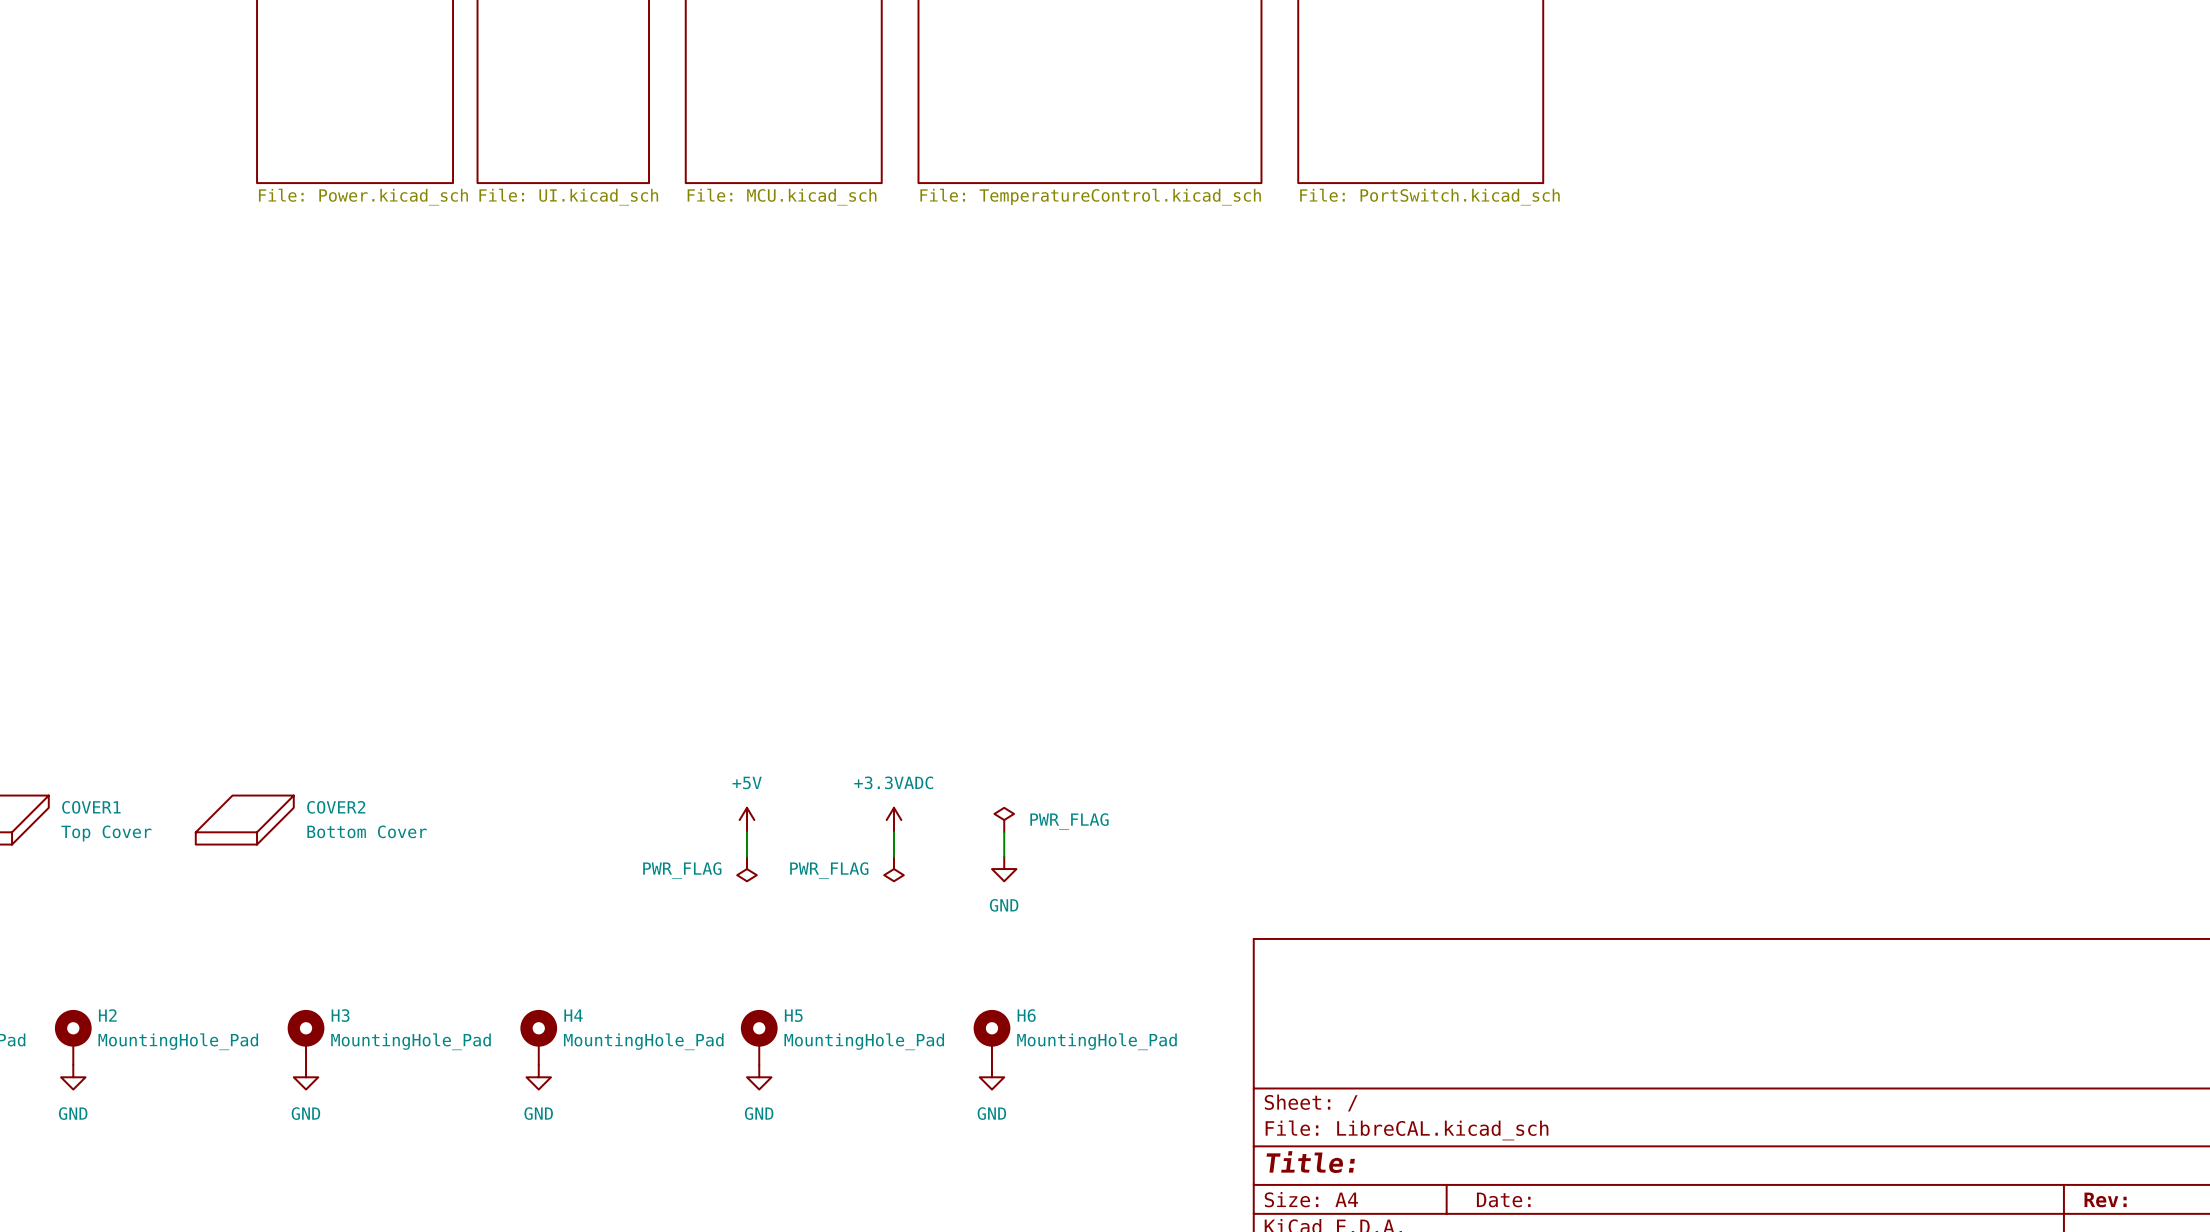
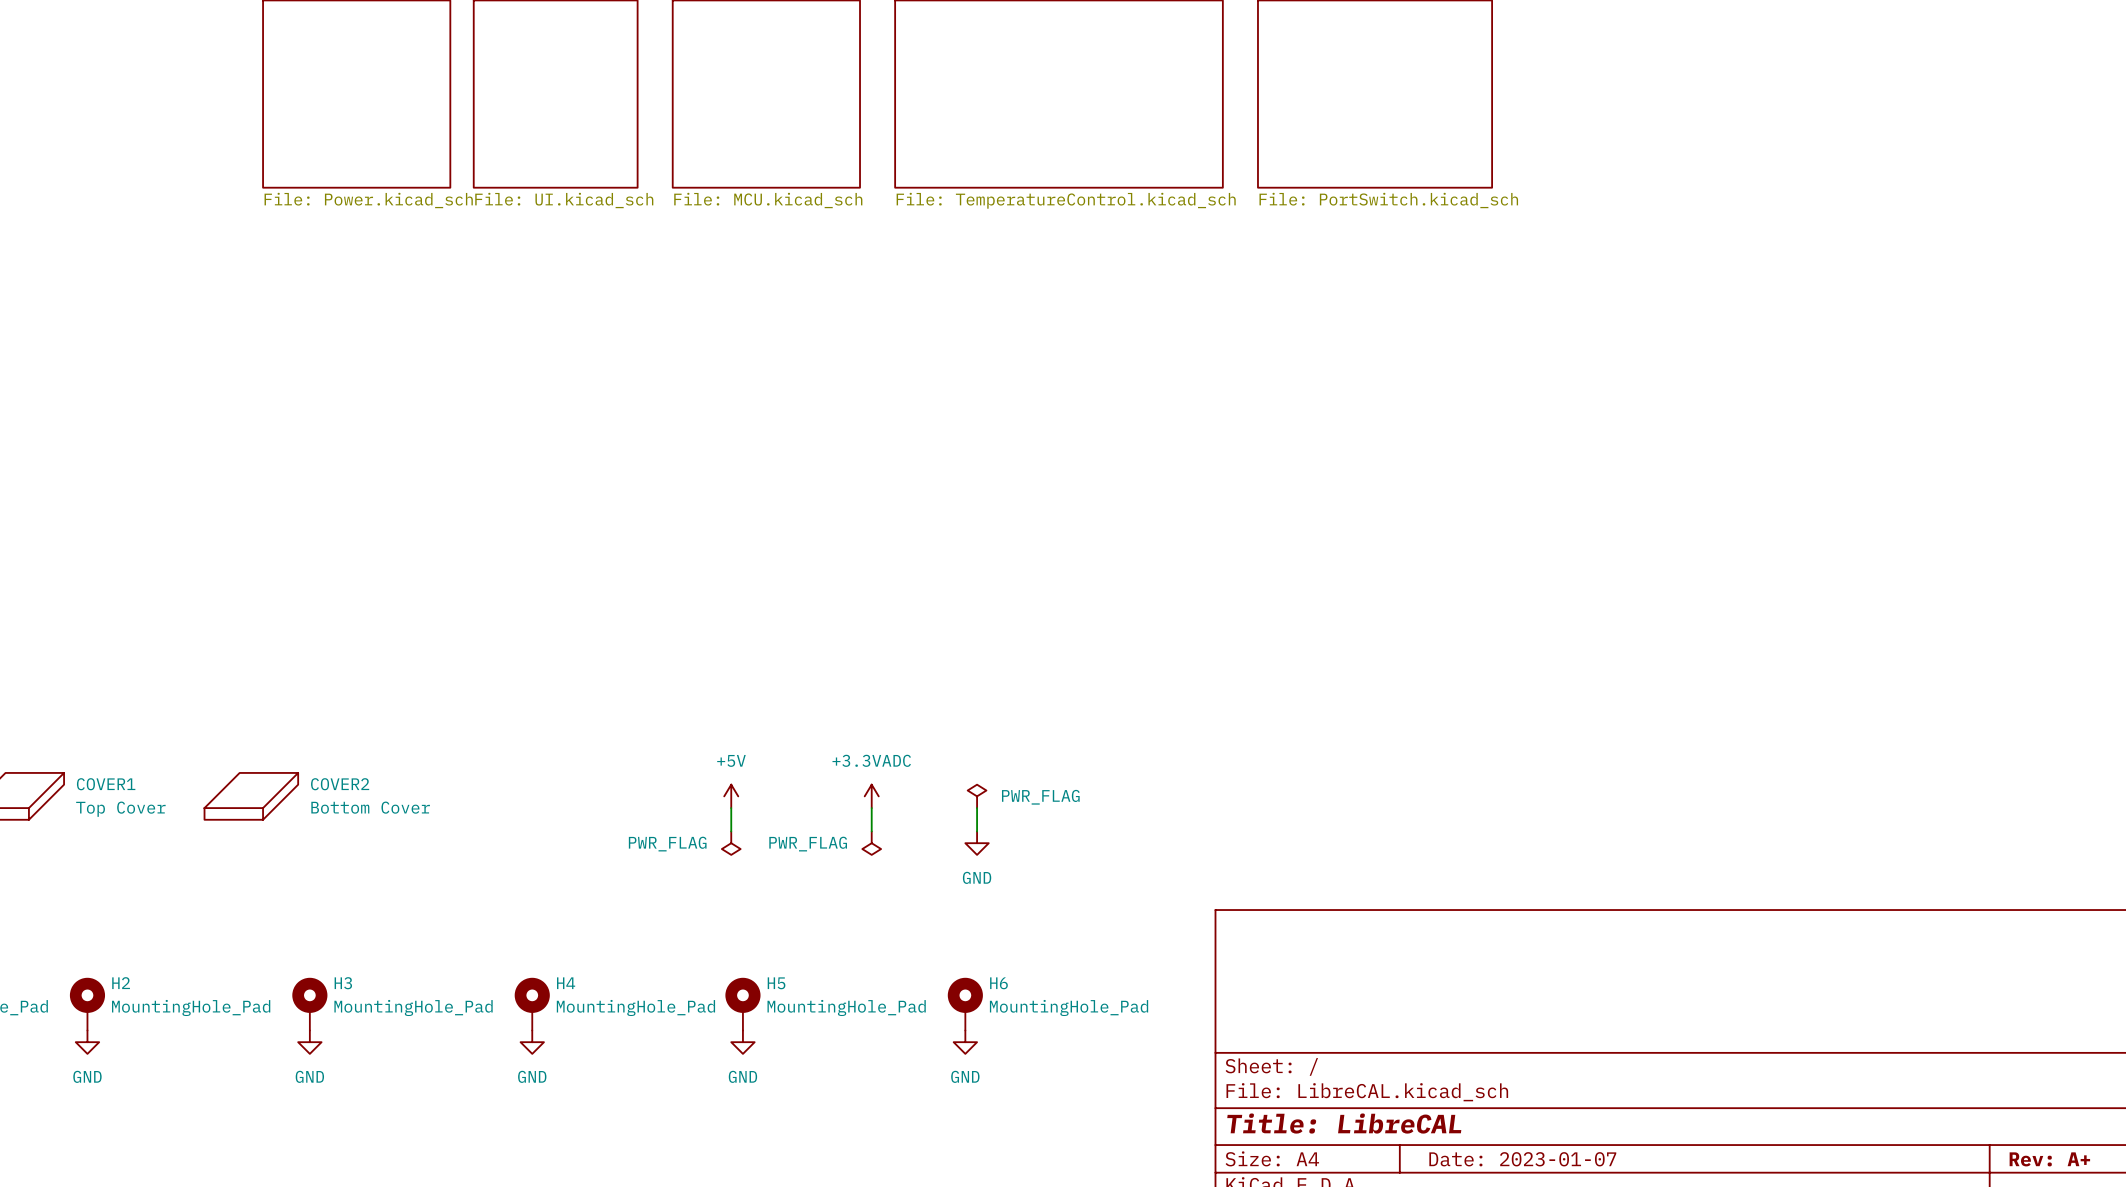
title block: Title: (1310, 1162) -> Title: LibreCAL (1344, 1123)
title block: Date: (1503, 1199) -> Date: 2023-01-07 (1522, 1159)
title block: Rev: (2105, 1199) -> Rev: A+ (2049, 1159)

